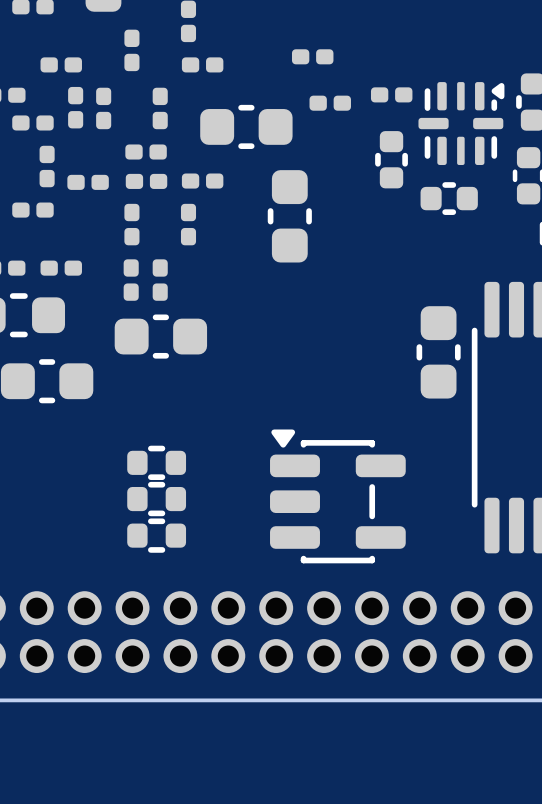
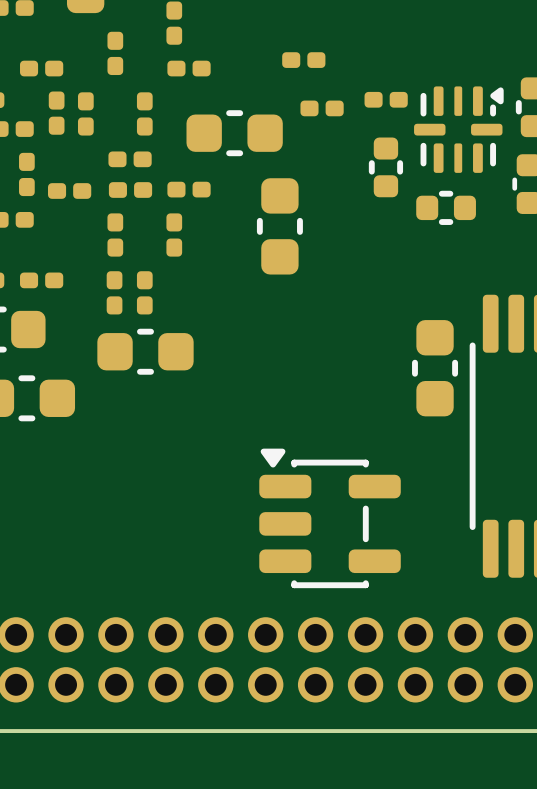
part: (156, 462) -> none
part: (156, 499) -> none
part: (156, 535) -> none

